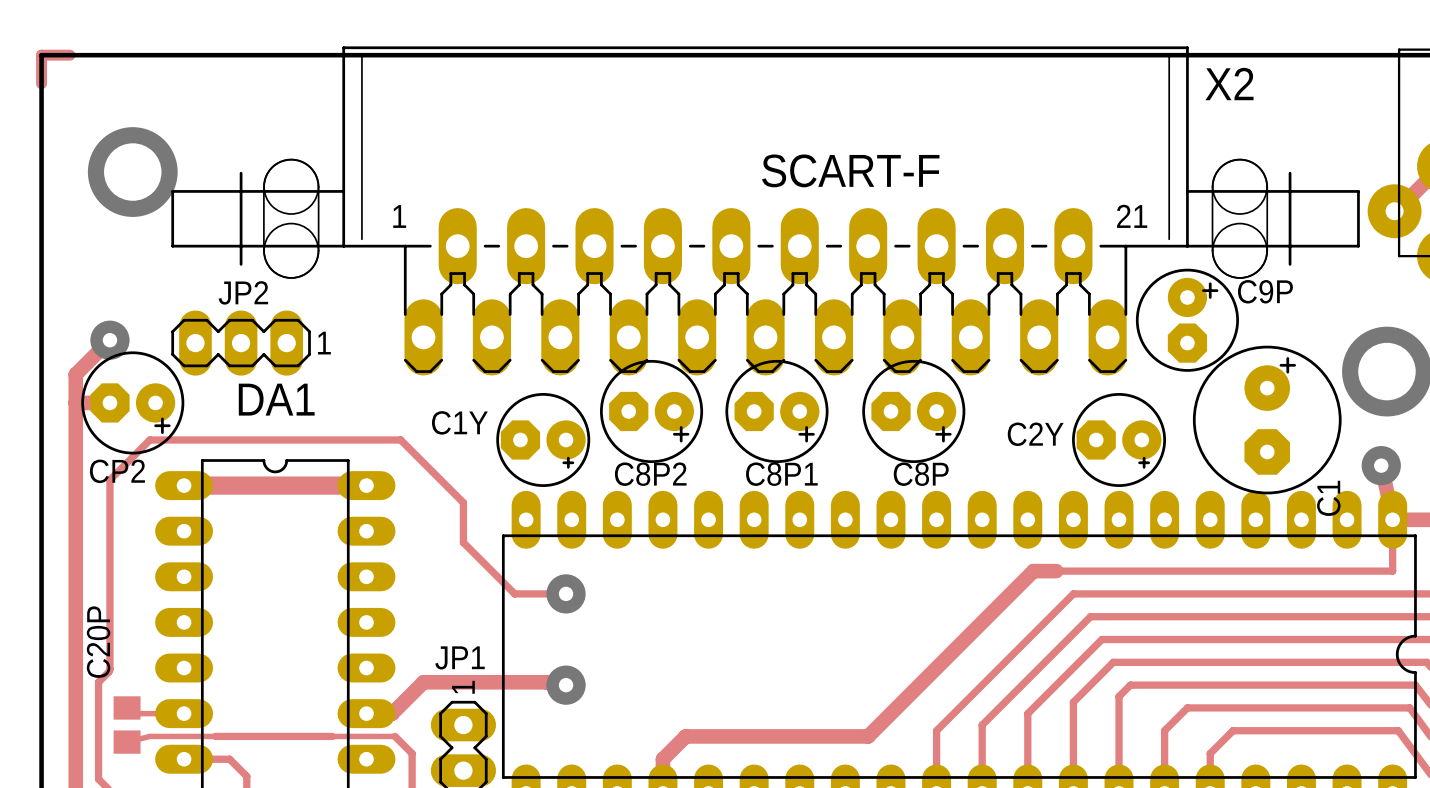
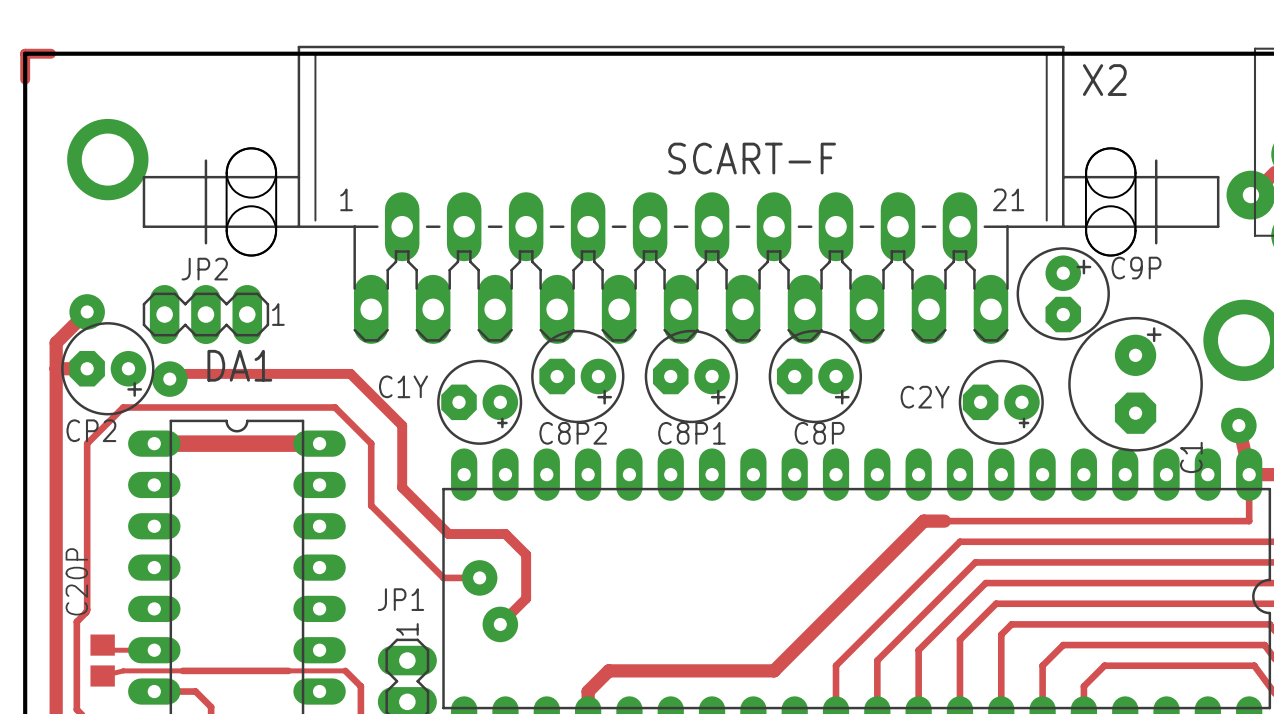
via: none -> (169, 379)
track: (109, 485) (109, 479) (149, 439) (400, 439) (463, 502) (463, 542) (514, 593) (566, 593) -> (87, 443) (123, 407) (335, 407) (371, 443) (371, 505) (443, 577) (479, 577)
via position: (566, 593) -> (479, 577)
track: (566, 685) (546, 682) (423, 682) (392, 713) (366, 713) -> (500, 624) (526, 598) (526, 554) (505, 534) (448, 534) (402, 487) (402, 425) (350, 373) (180, 373) (169, 379)

